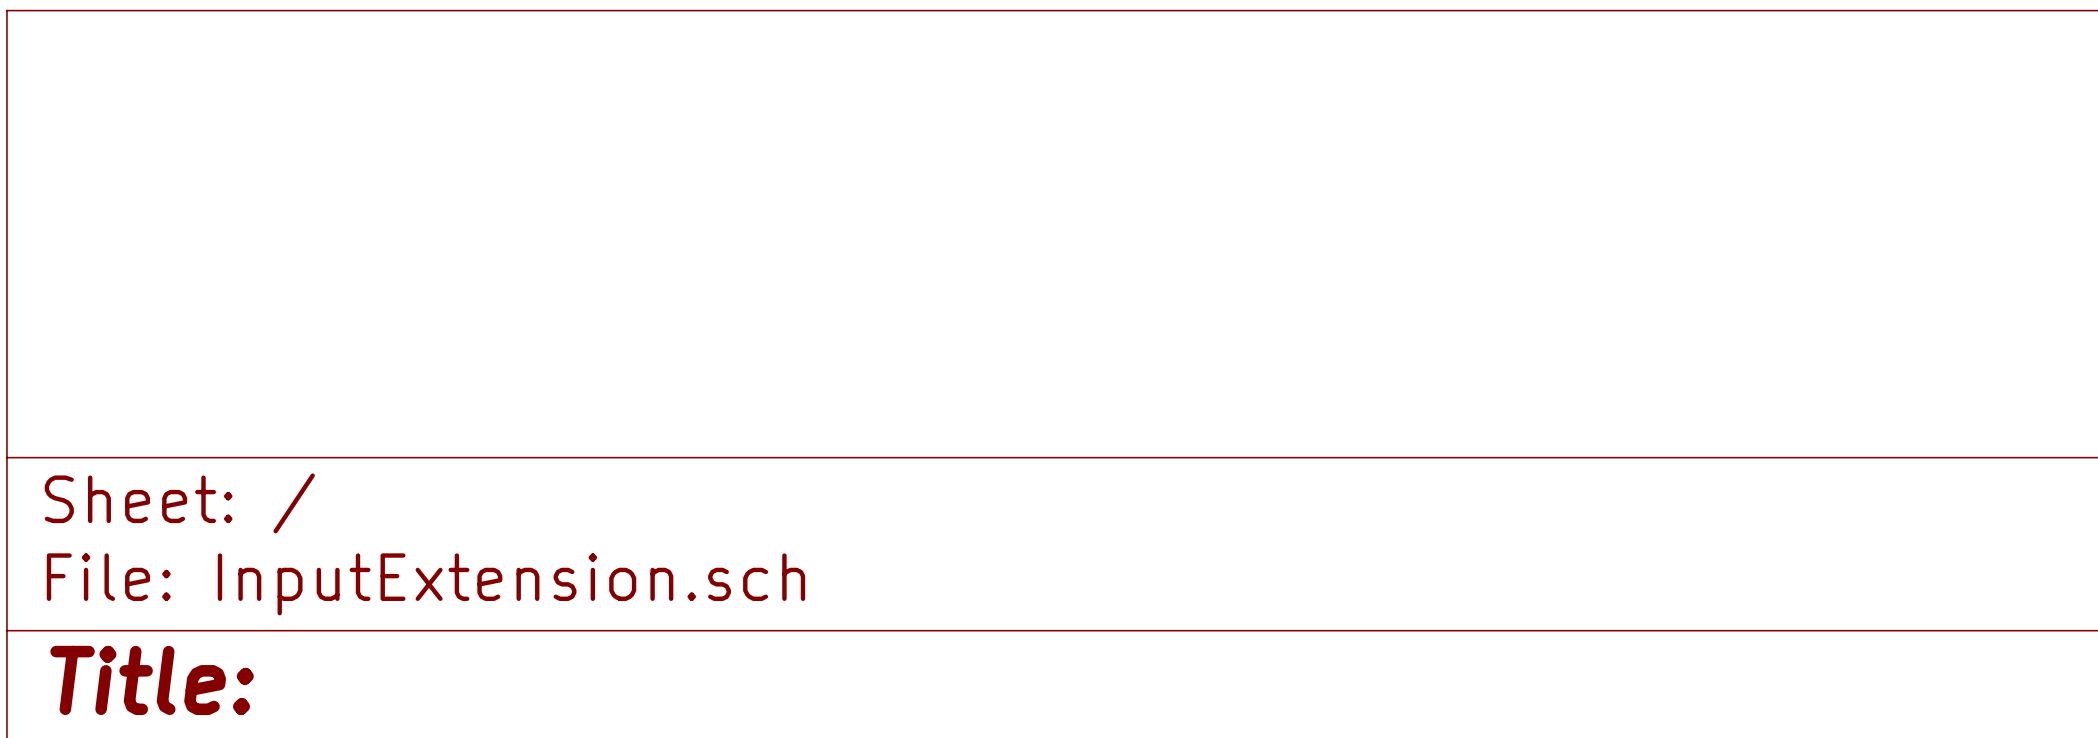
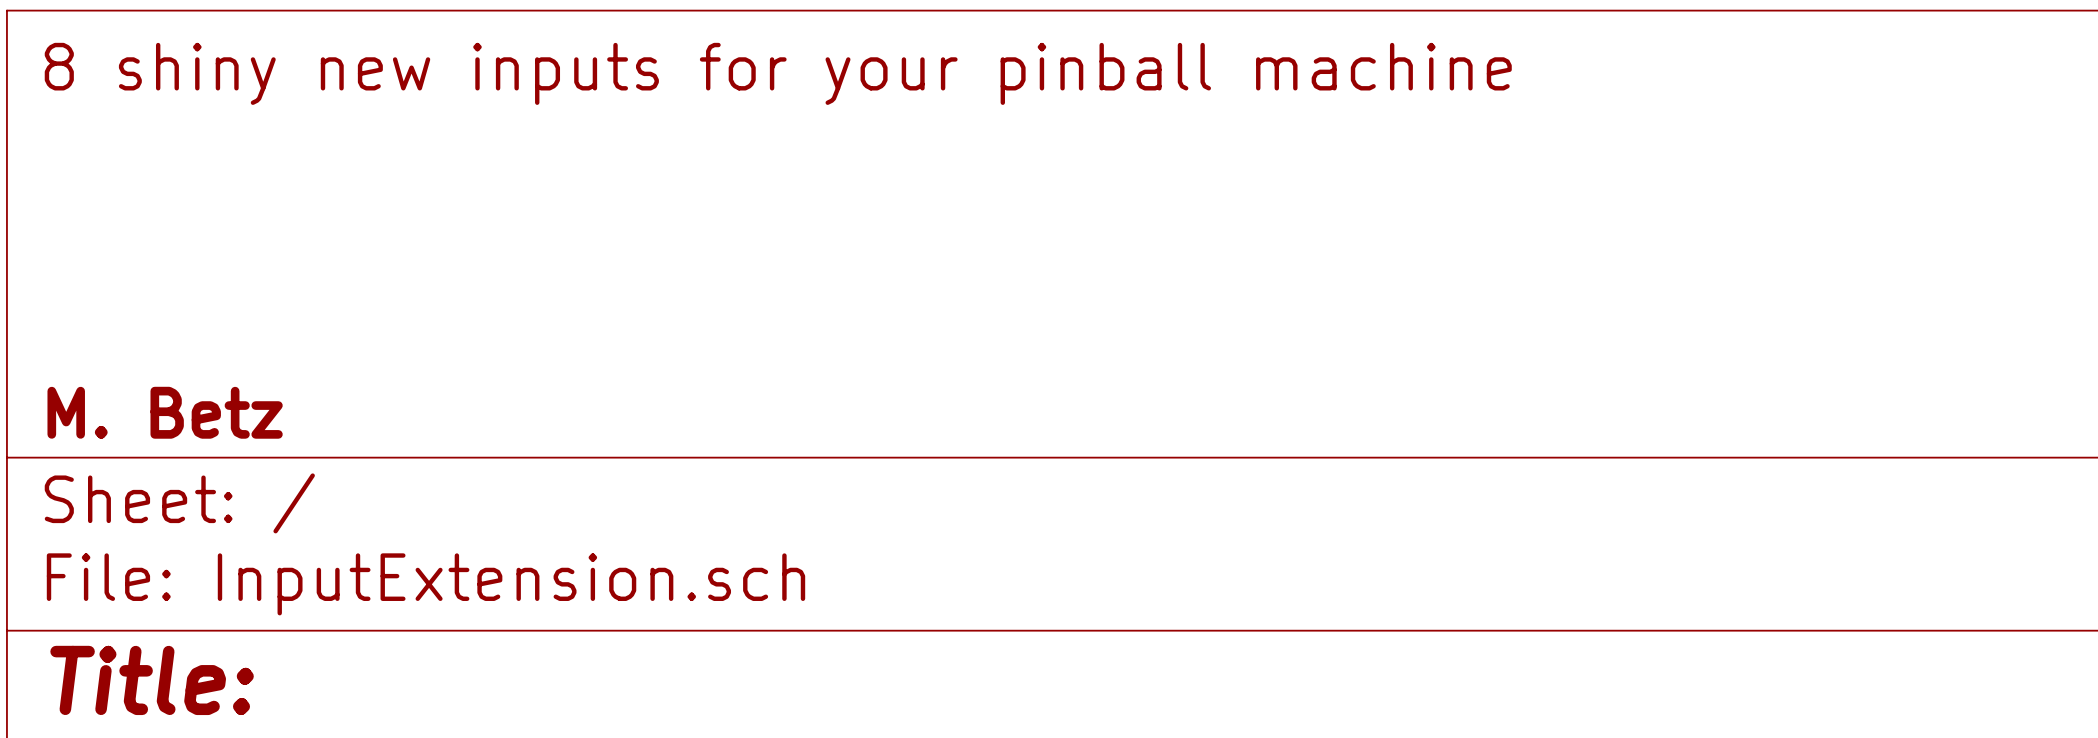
title block: none -> 8 shiny new inputs for your pinball machine (778, 73)
title block: none -> M. Betz (165, 412)

